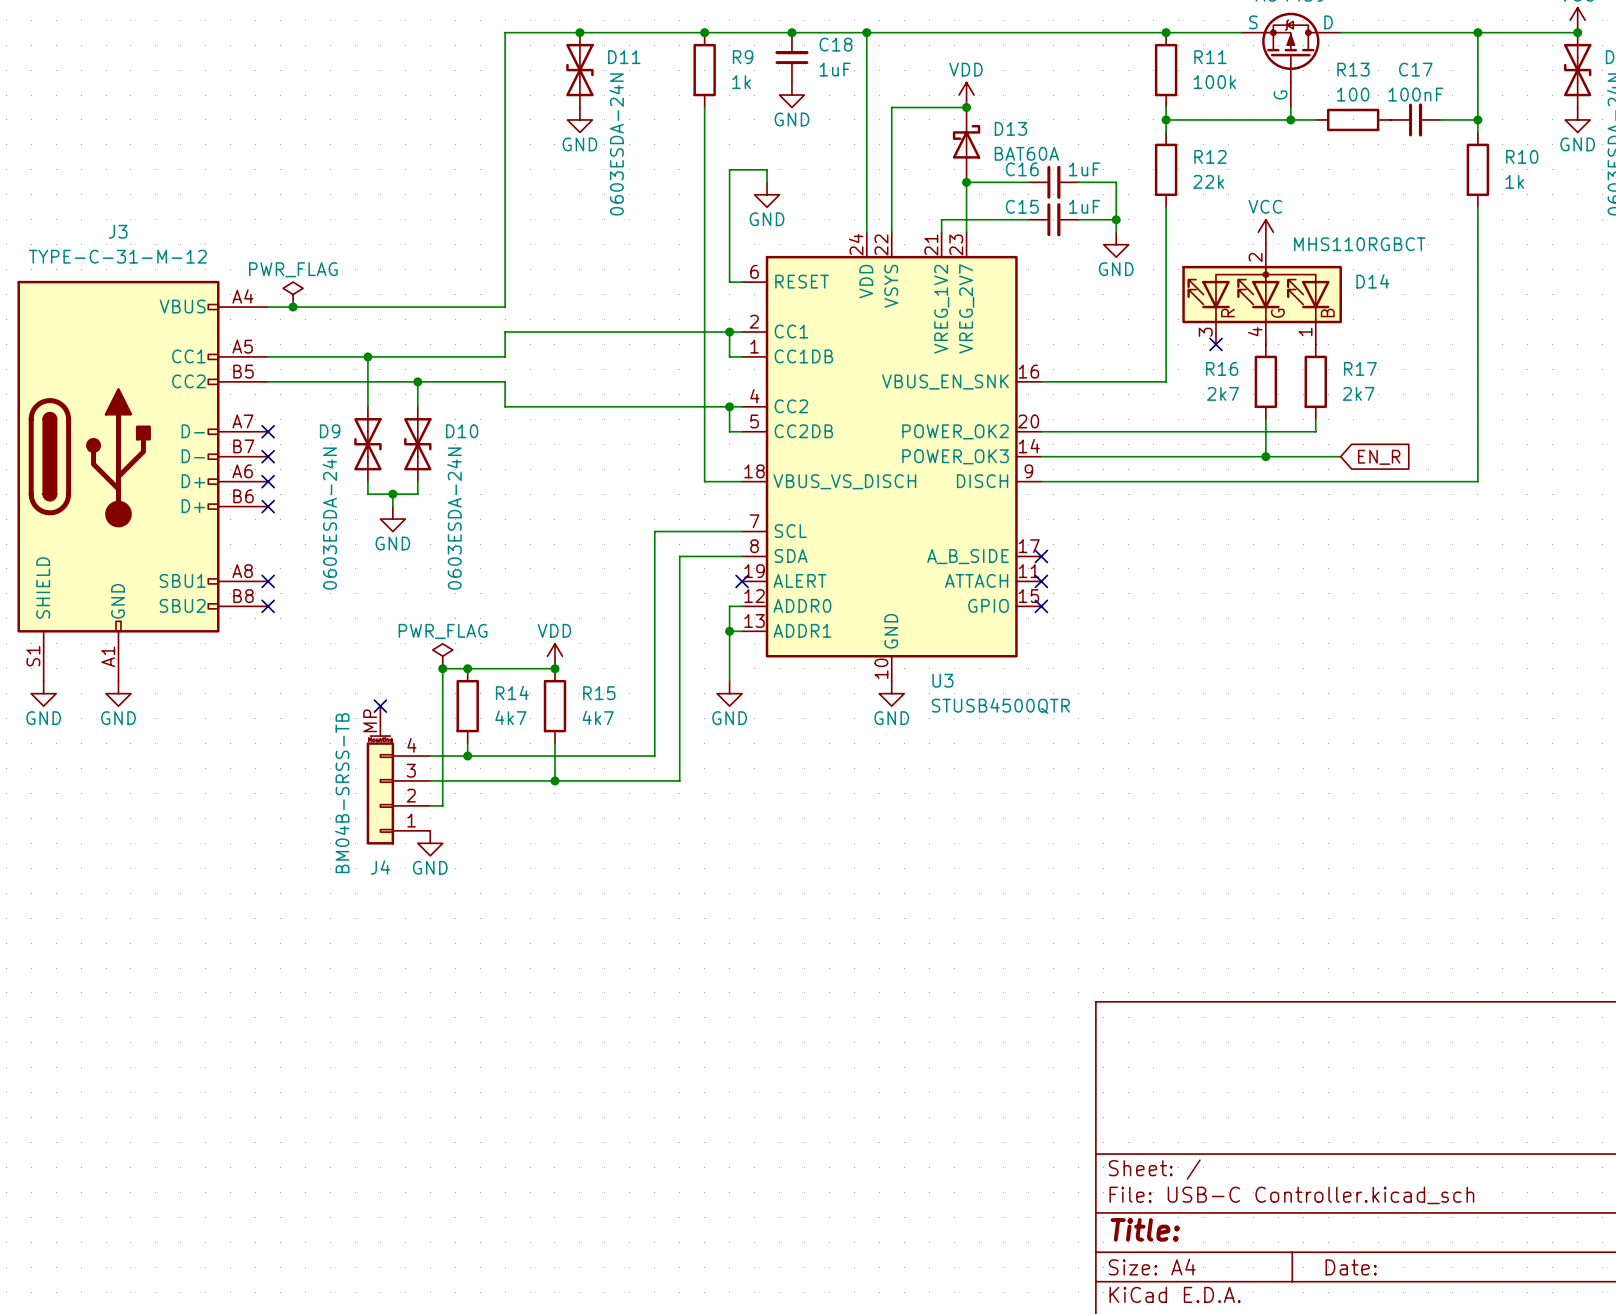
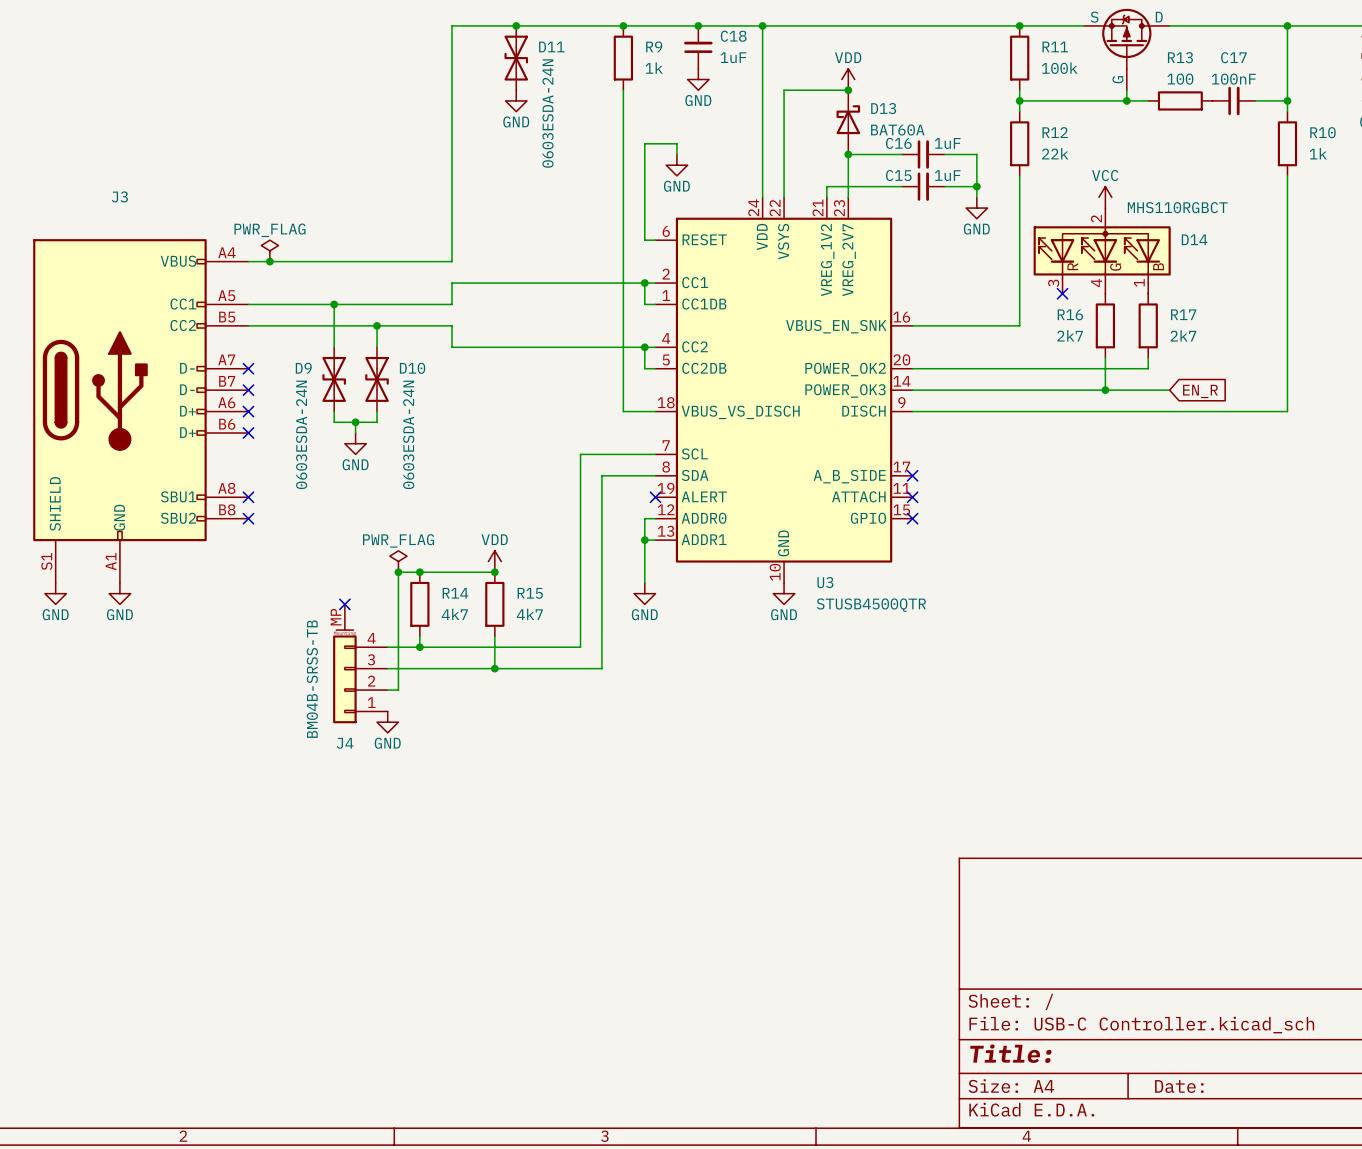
J3 value: TYPE-C-31-M-12 (117, 256) -> none

